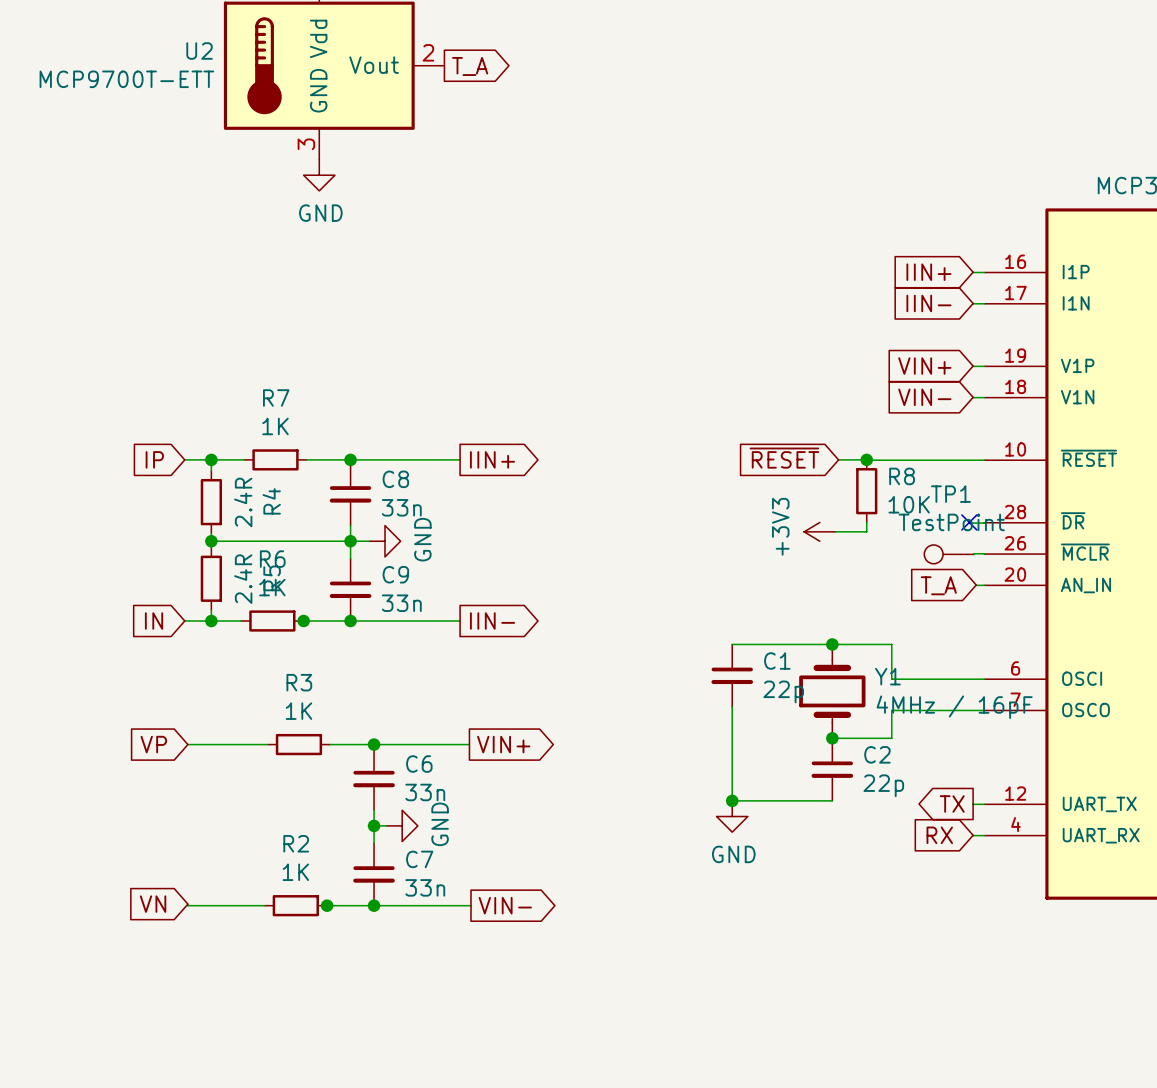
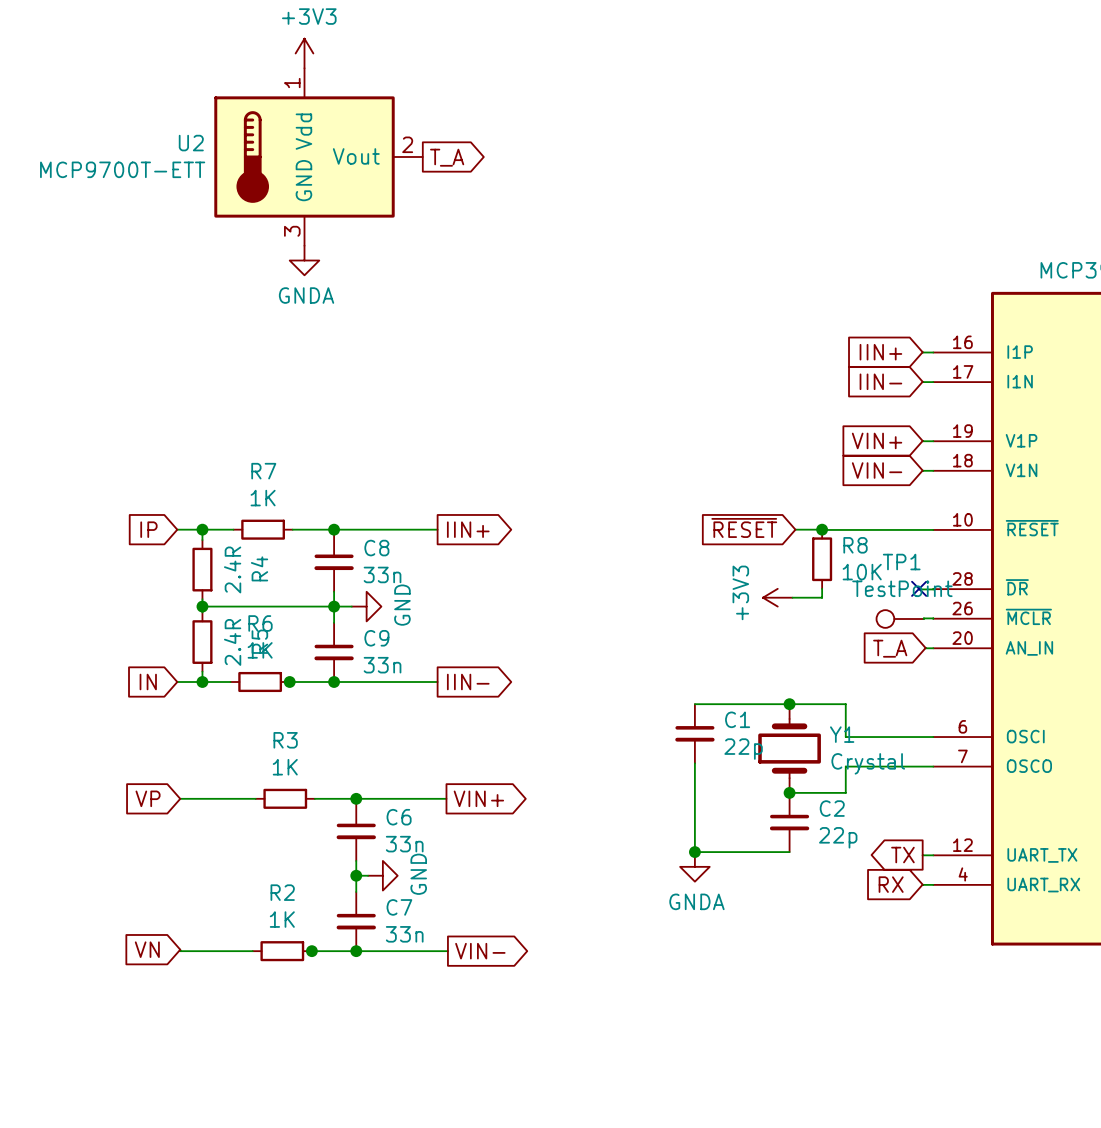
power symbol: GND (319, 175) -> GNDA (304, 260)
Y1 value: 4MHz / 16pF (954, 707) -> Crystal (868, 763)
power symbol: GND (732, 816) -> GNDA (694, 866)

